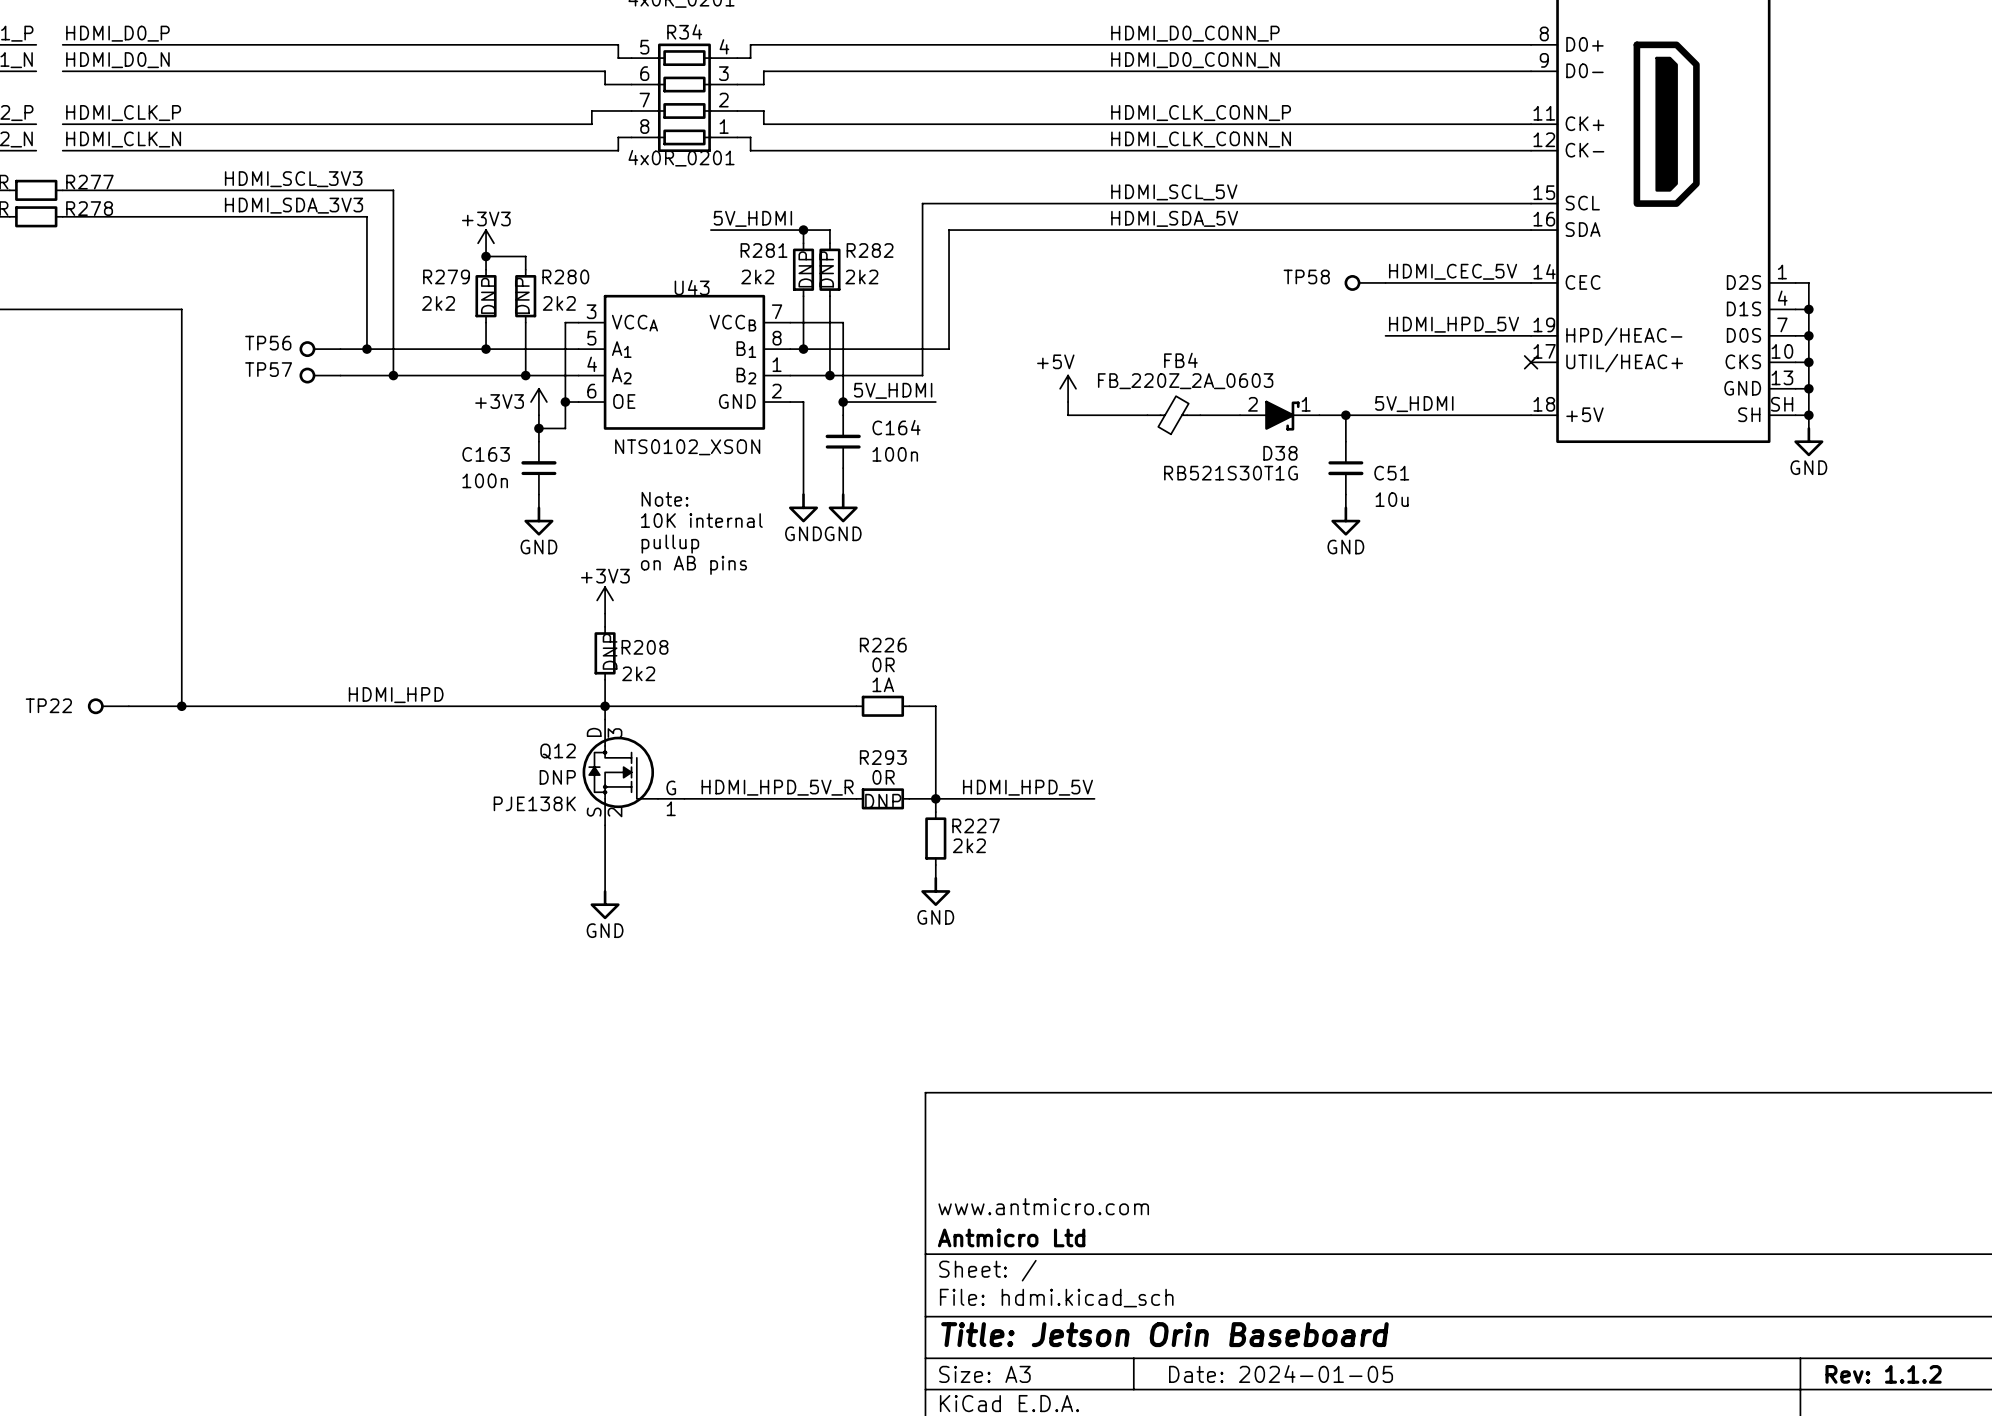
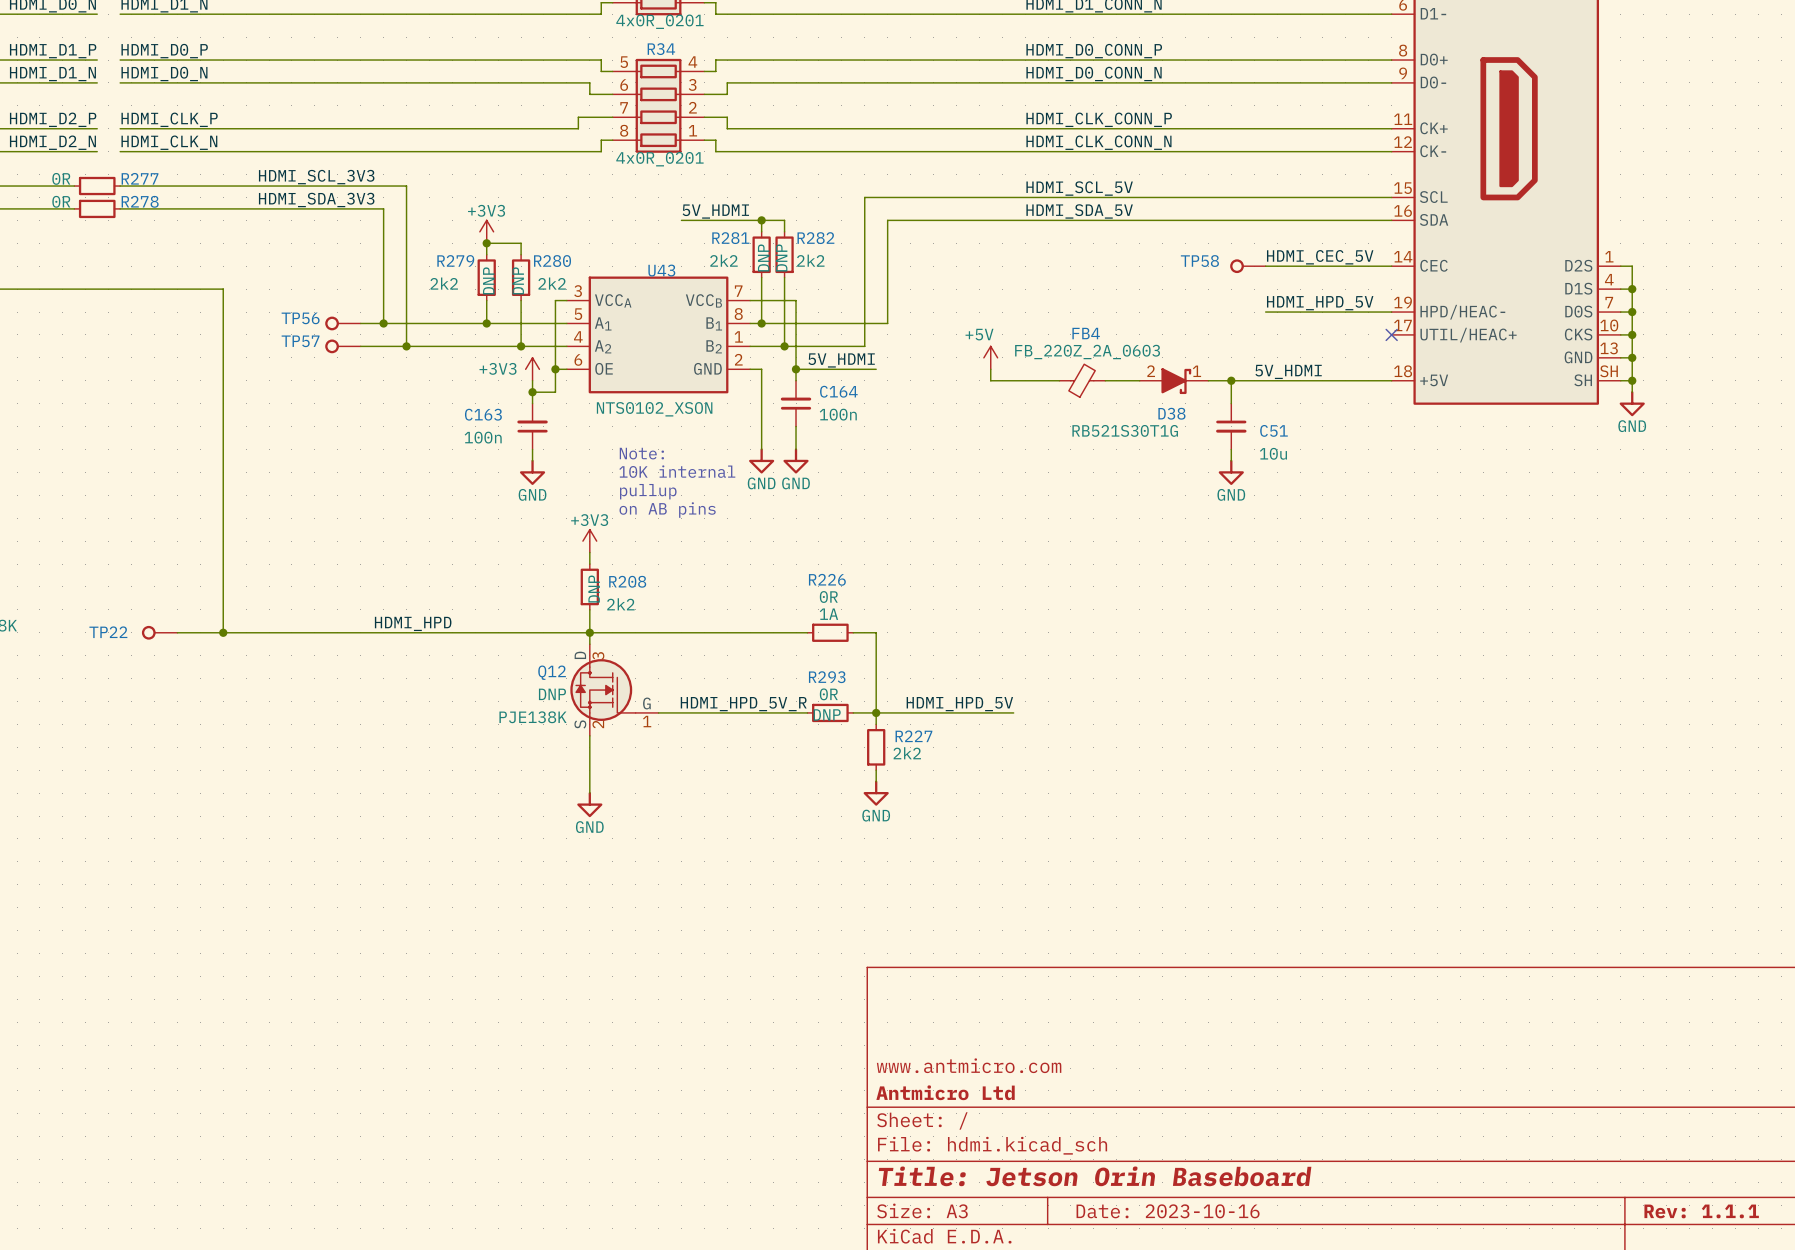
title block: Date: 2024-01-05 (1281, 1374) -> Date: 2023-10-16 (1168, 1211)
title block: Rev: 1.1.2 (1883, 1374) -> Rev: 1.1.1 (1701, 1211)

